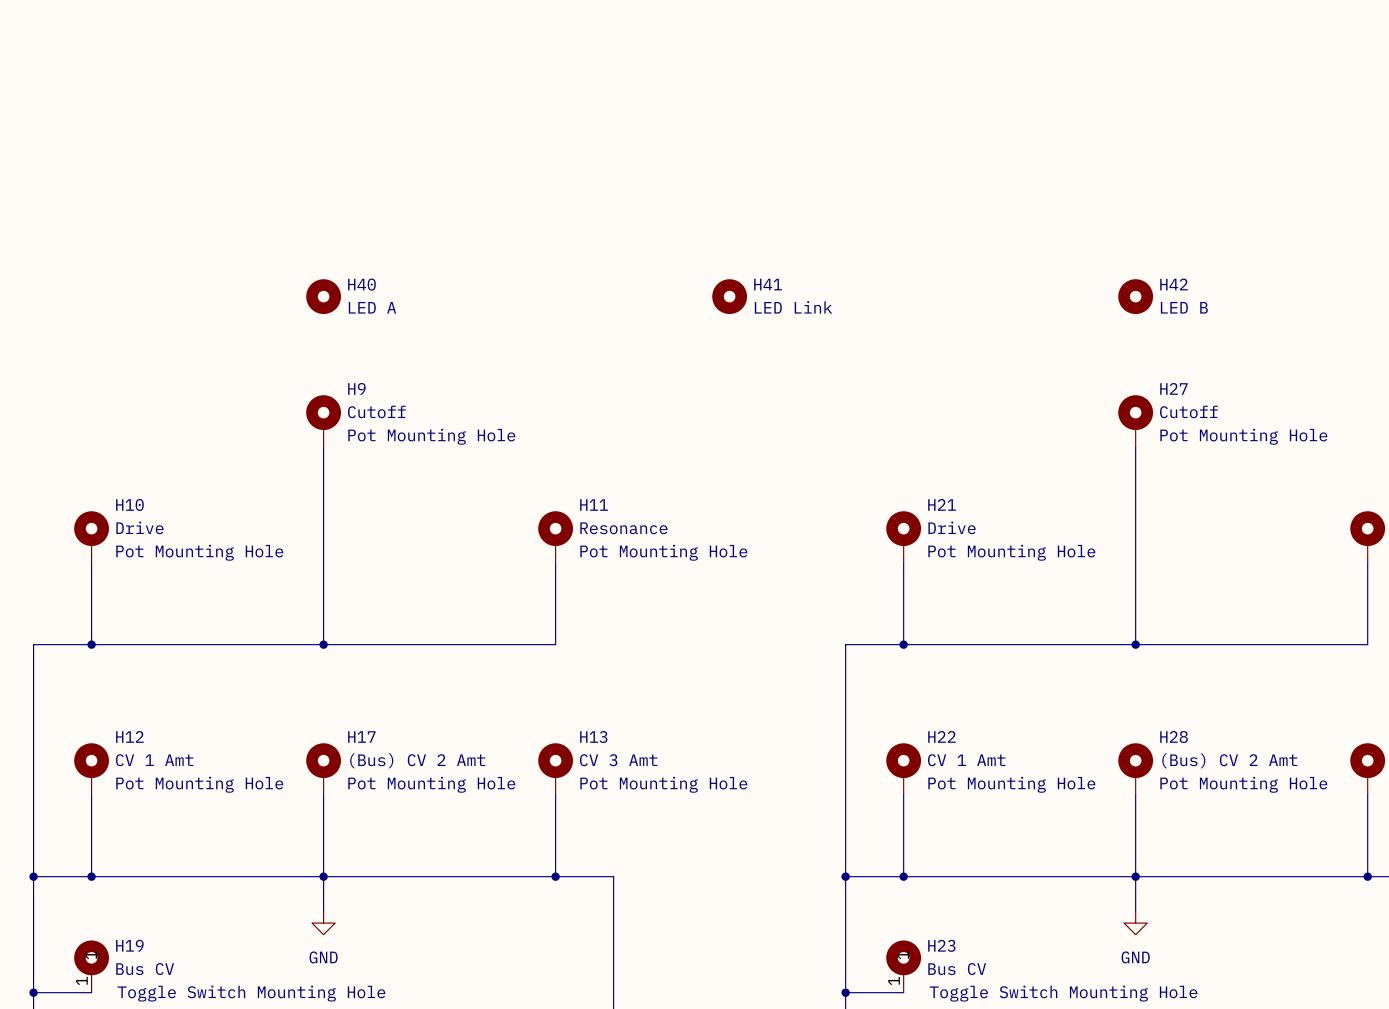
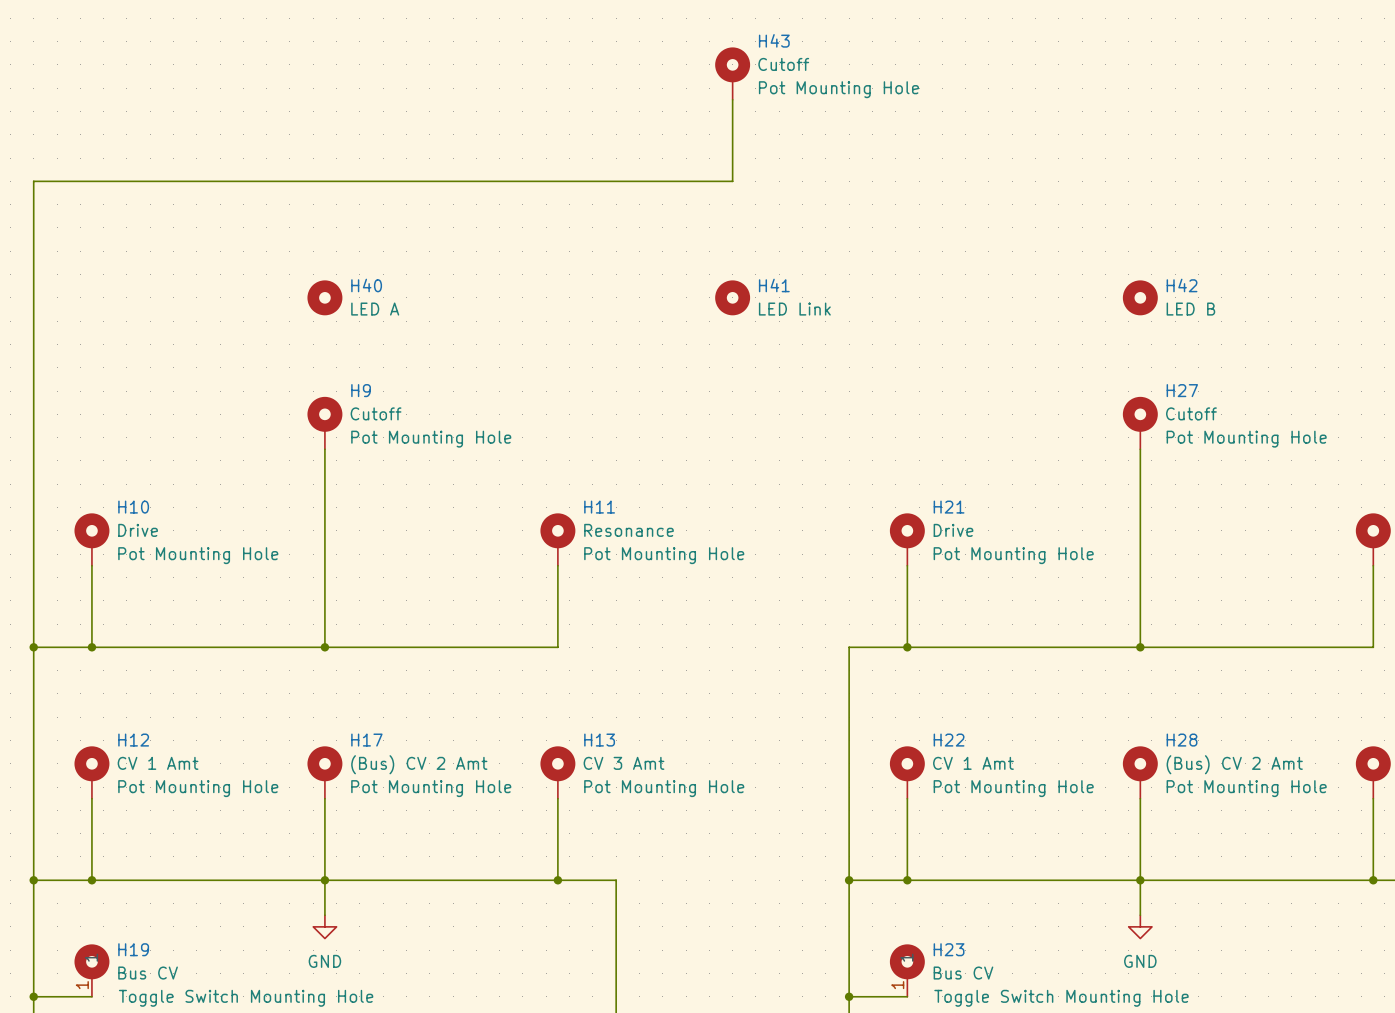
H43: none -> Cutoff (732, 73)
wire: none -> (732, 99) (732, 181) (33, 181) (33, 647)
junction: none -> (33, 647)

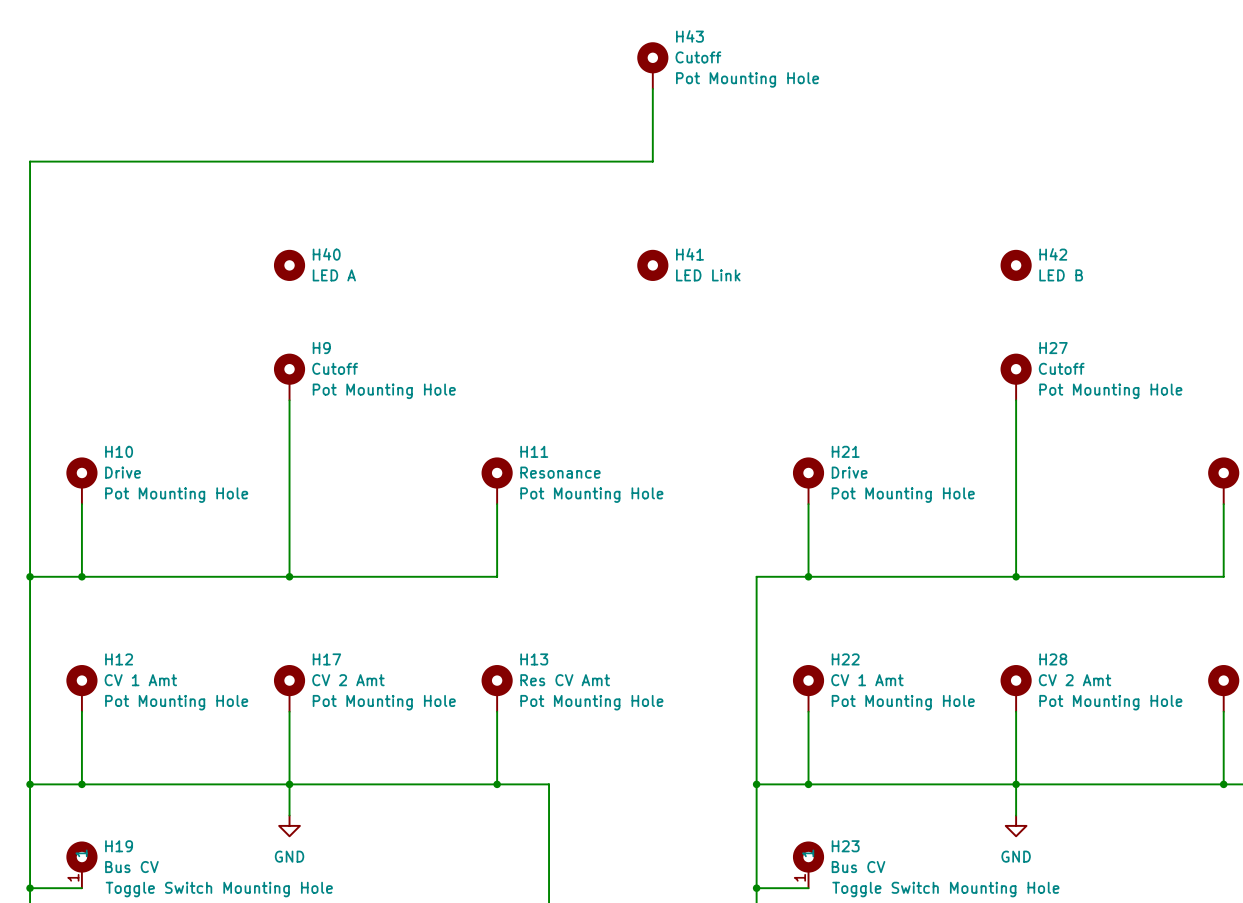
H13 value: CV 3 Amt (624, 763) -> Res CV Amt (565, 680)
H17 value: (Bus) CV 2 Amt (419, 764) -> CV 2 Amt (348, 680)
H28 value: (Bus) CV 2 Amt (1234, 764) -> CV 2 Amt (1075, 680)

